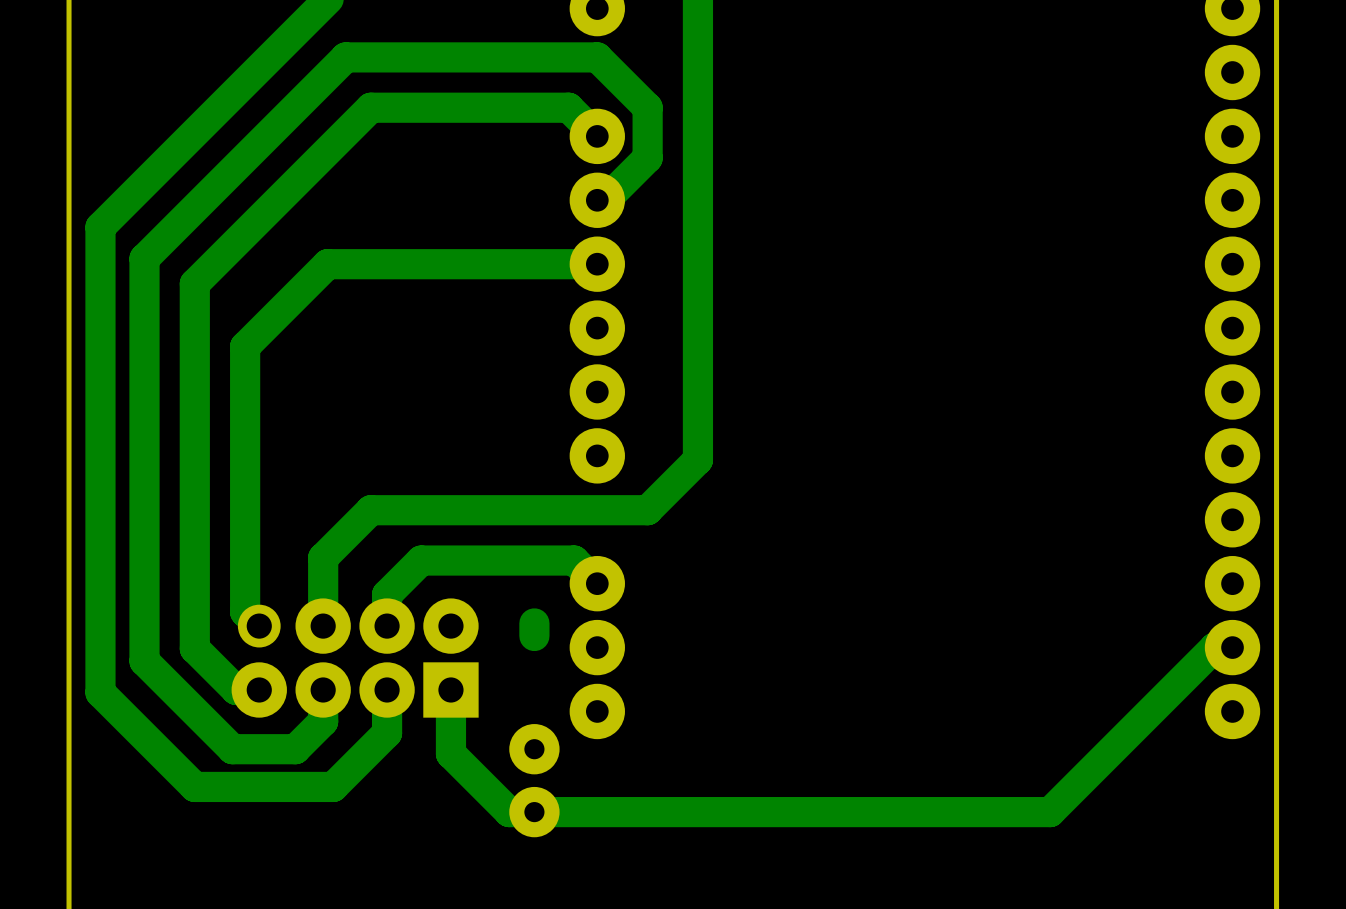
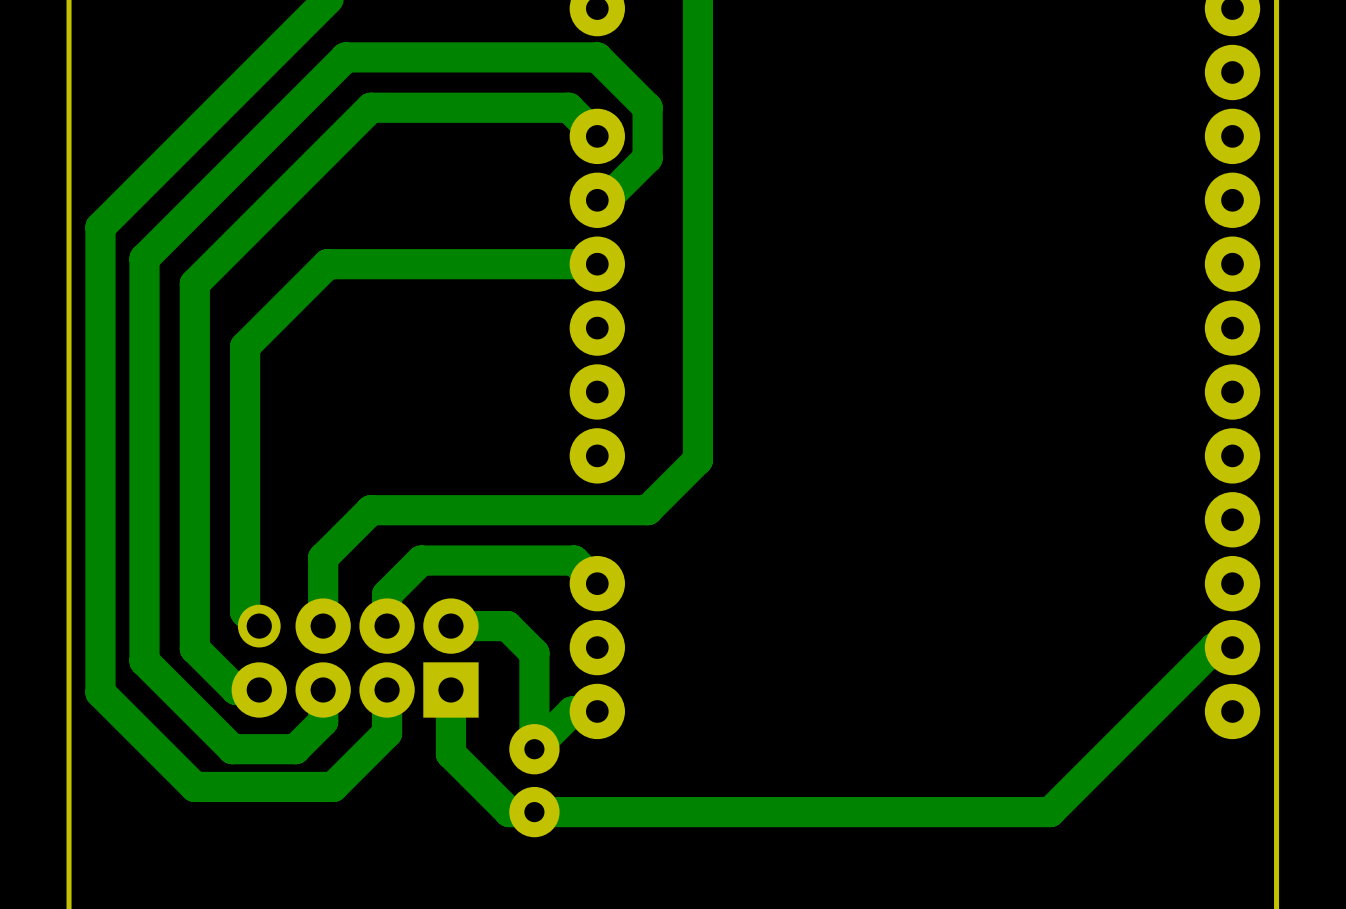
bottom track: (534, 623) (534, 636) -> none
bottom track: none -> (450, 626) (507, 626) (534, 653) (534, 749) (572, 711) (597, 711)

